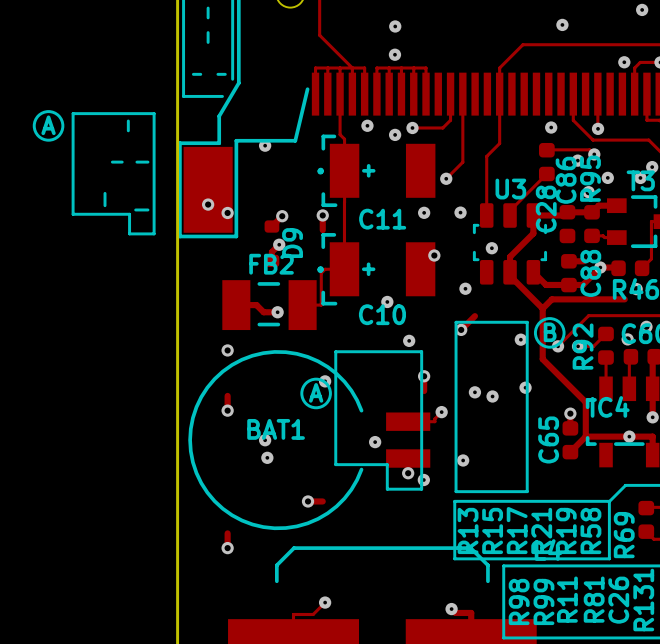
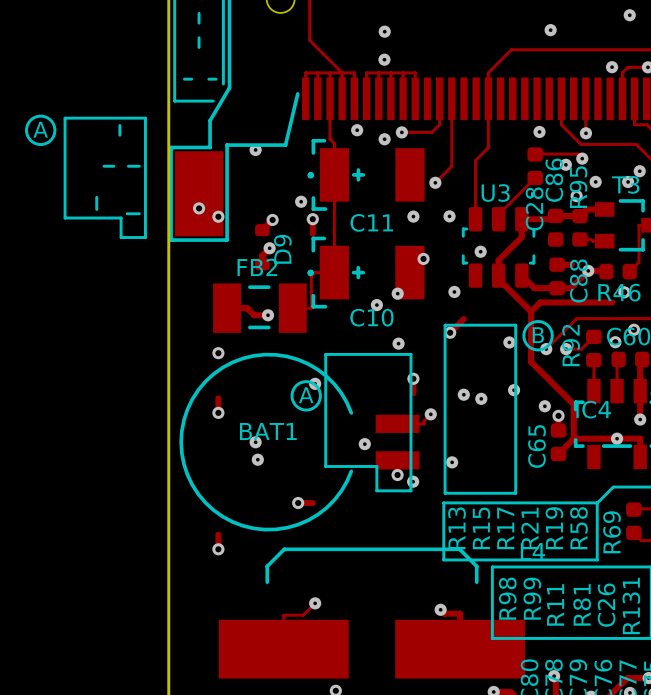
via: none -> (301, 201)
via: none -> (397, 293)
via: none -> (544, 406)

